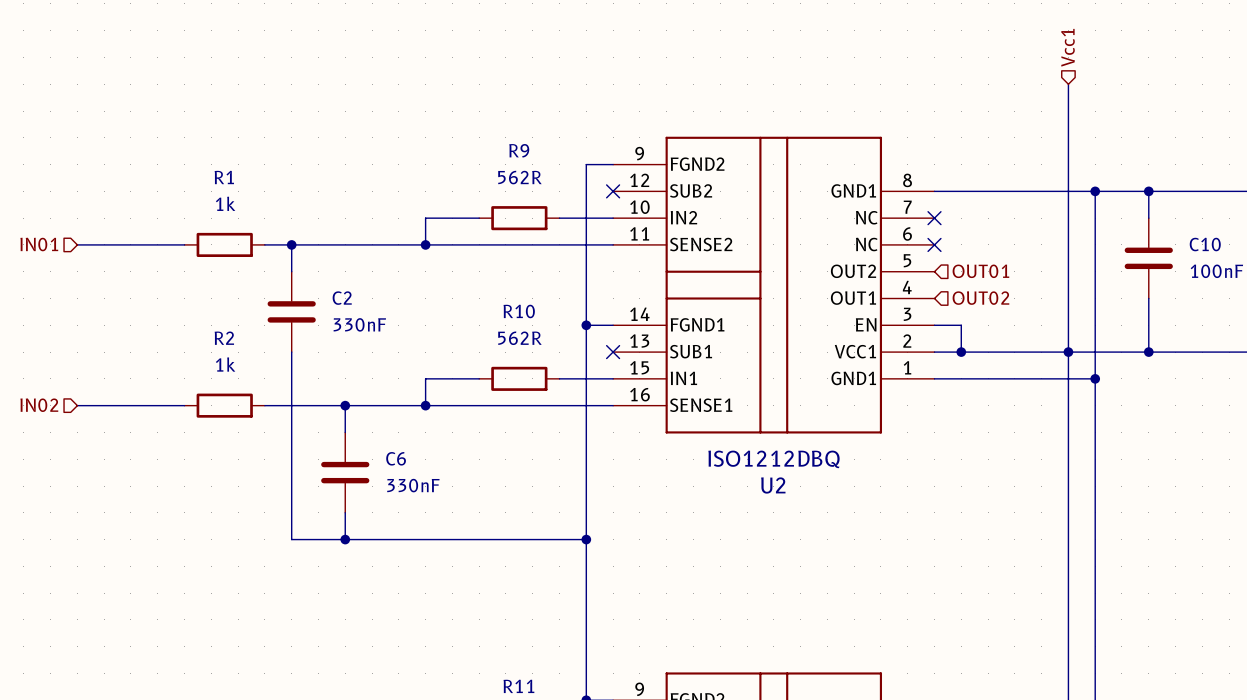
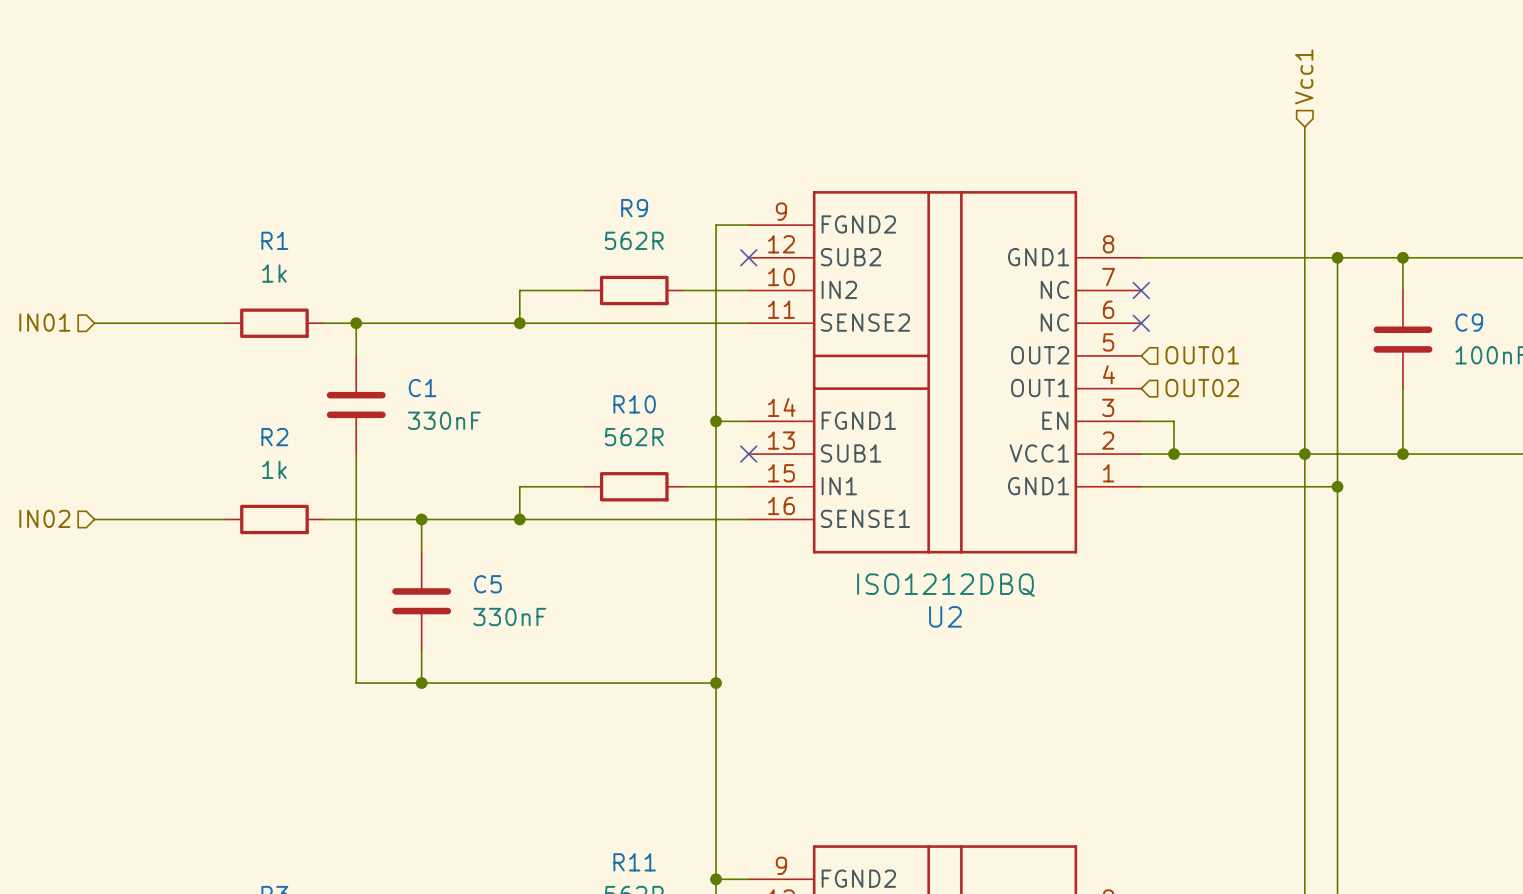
C10 name: C10 (1205, 244) -> C9 (1469, 322)
C2 name: C2 (342, 298) -> C1 (422, 388)
C6 name: C6 (396, 458) -> C5 (487, 584)

